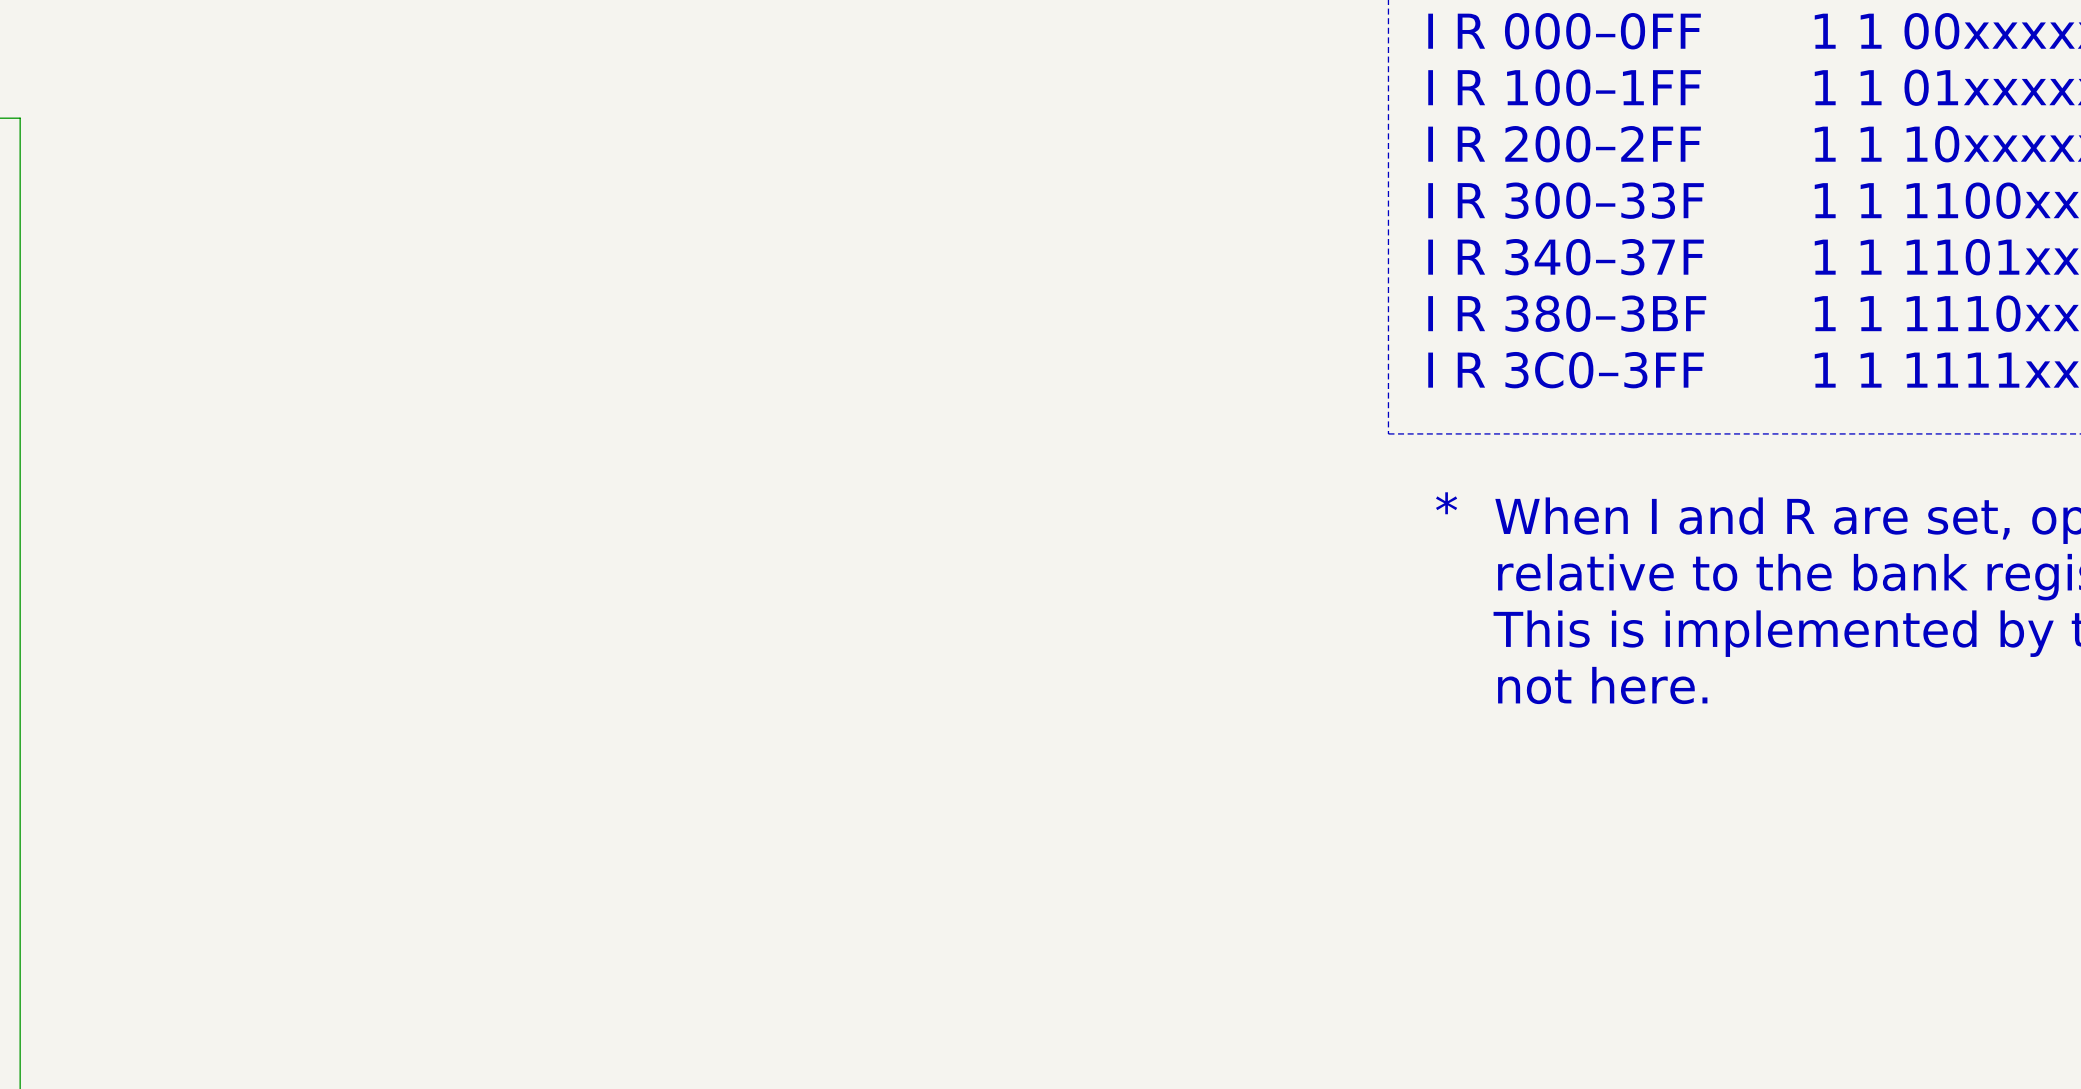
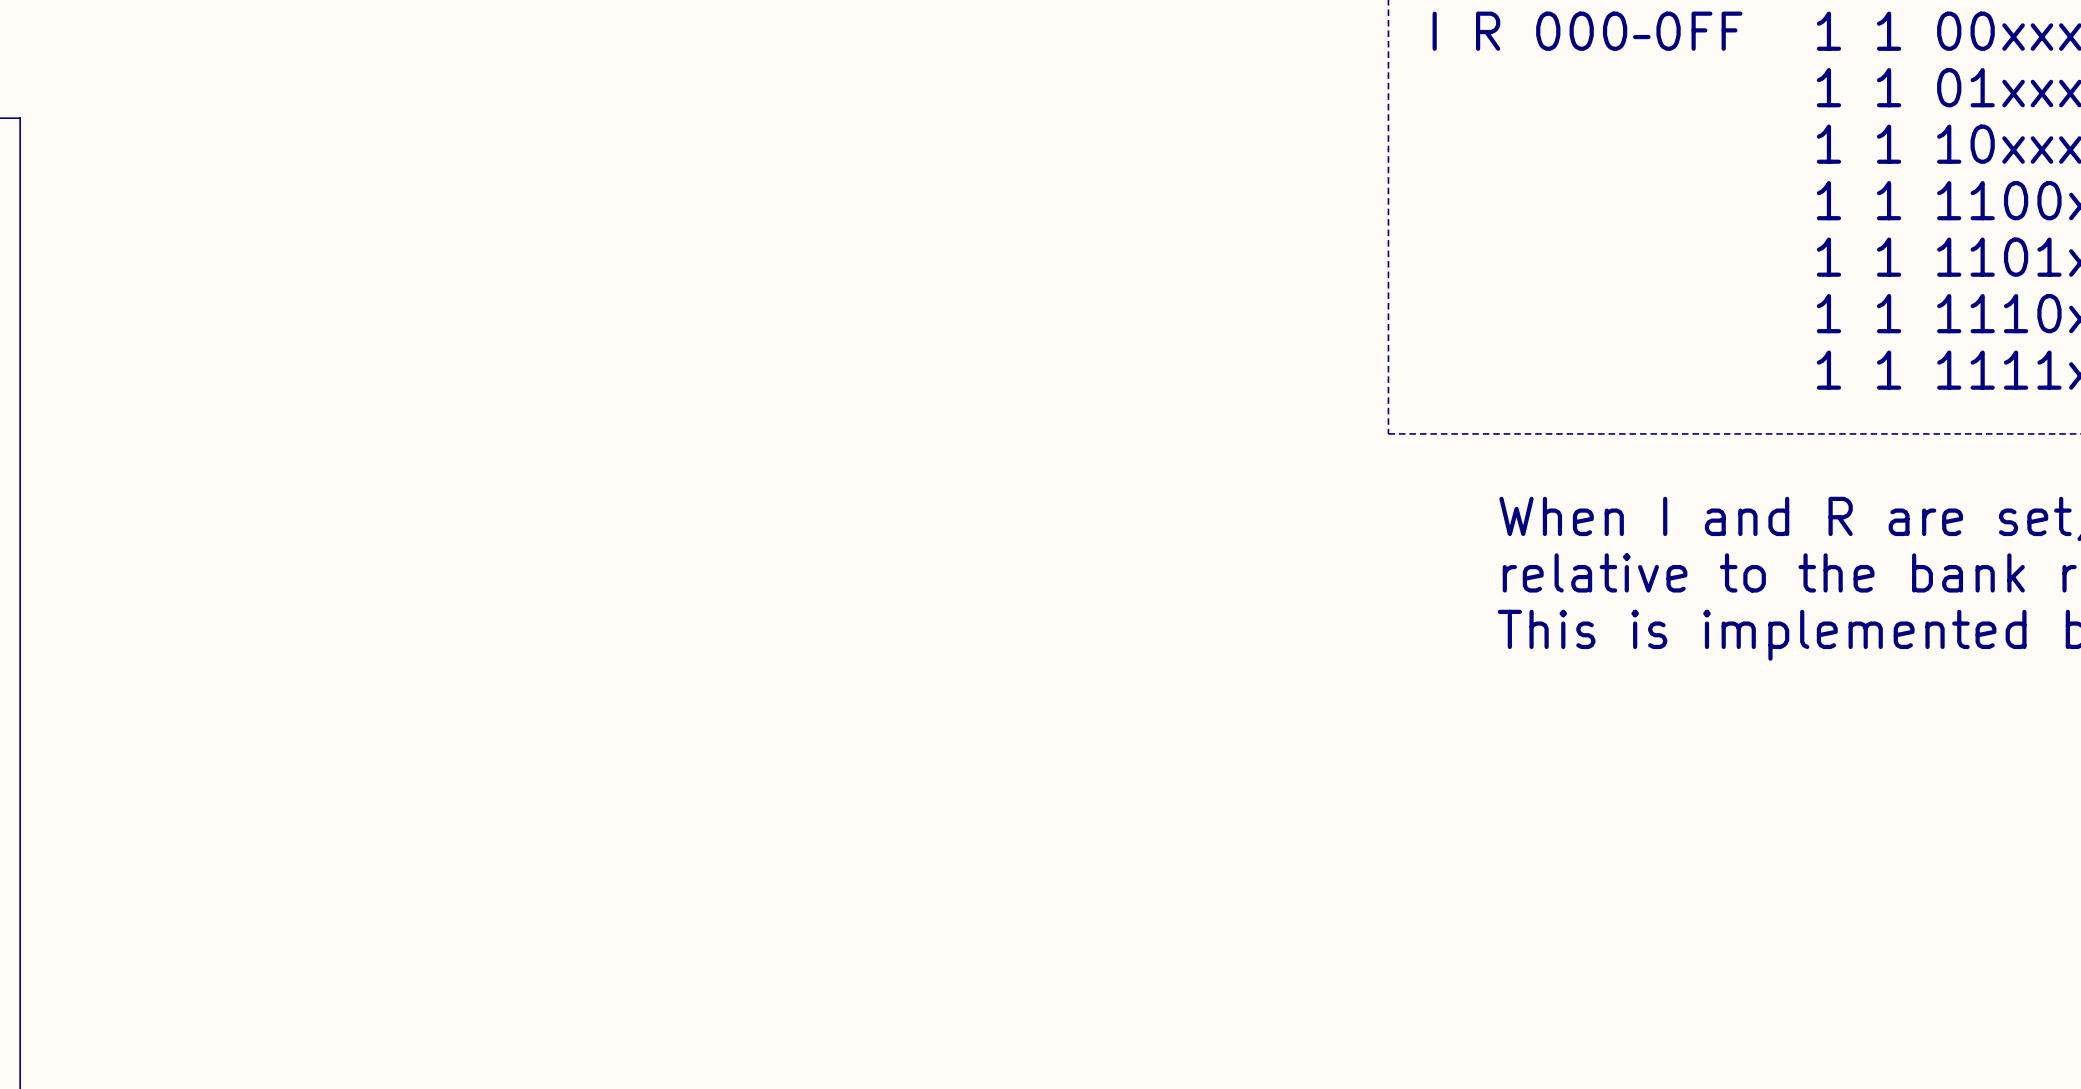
text: I R 100–1FF (1564, 87) -> none
text: I R 200–2FF (1564, 144) -> none
text: I R 300–33F (1566, 200) -> none
text: I R 340–37F (1566, 257) -> none
text: I R 380–3BF (1567, 313) -> none
text: I R 3C0–3FF (1566, 370) -> none
text: * (1446, 503) -> none
text: not here. (1602, 685) -> none

